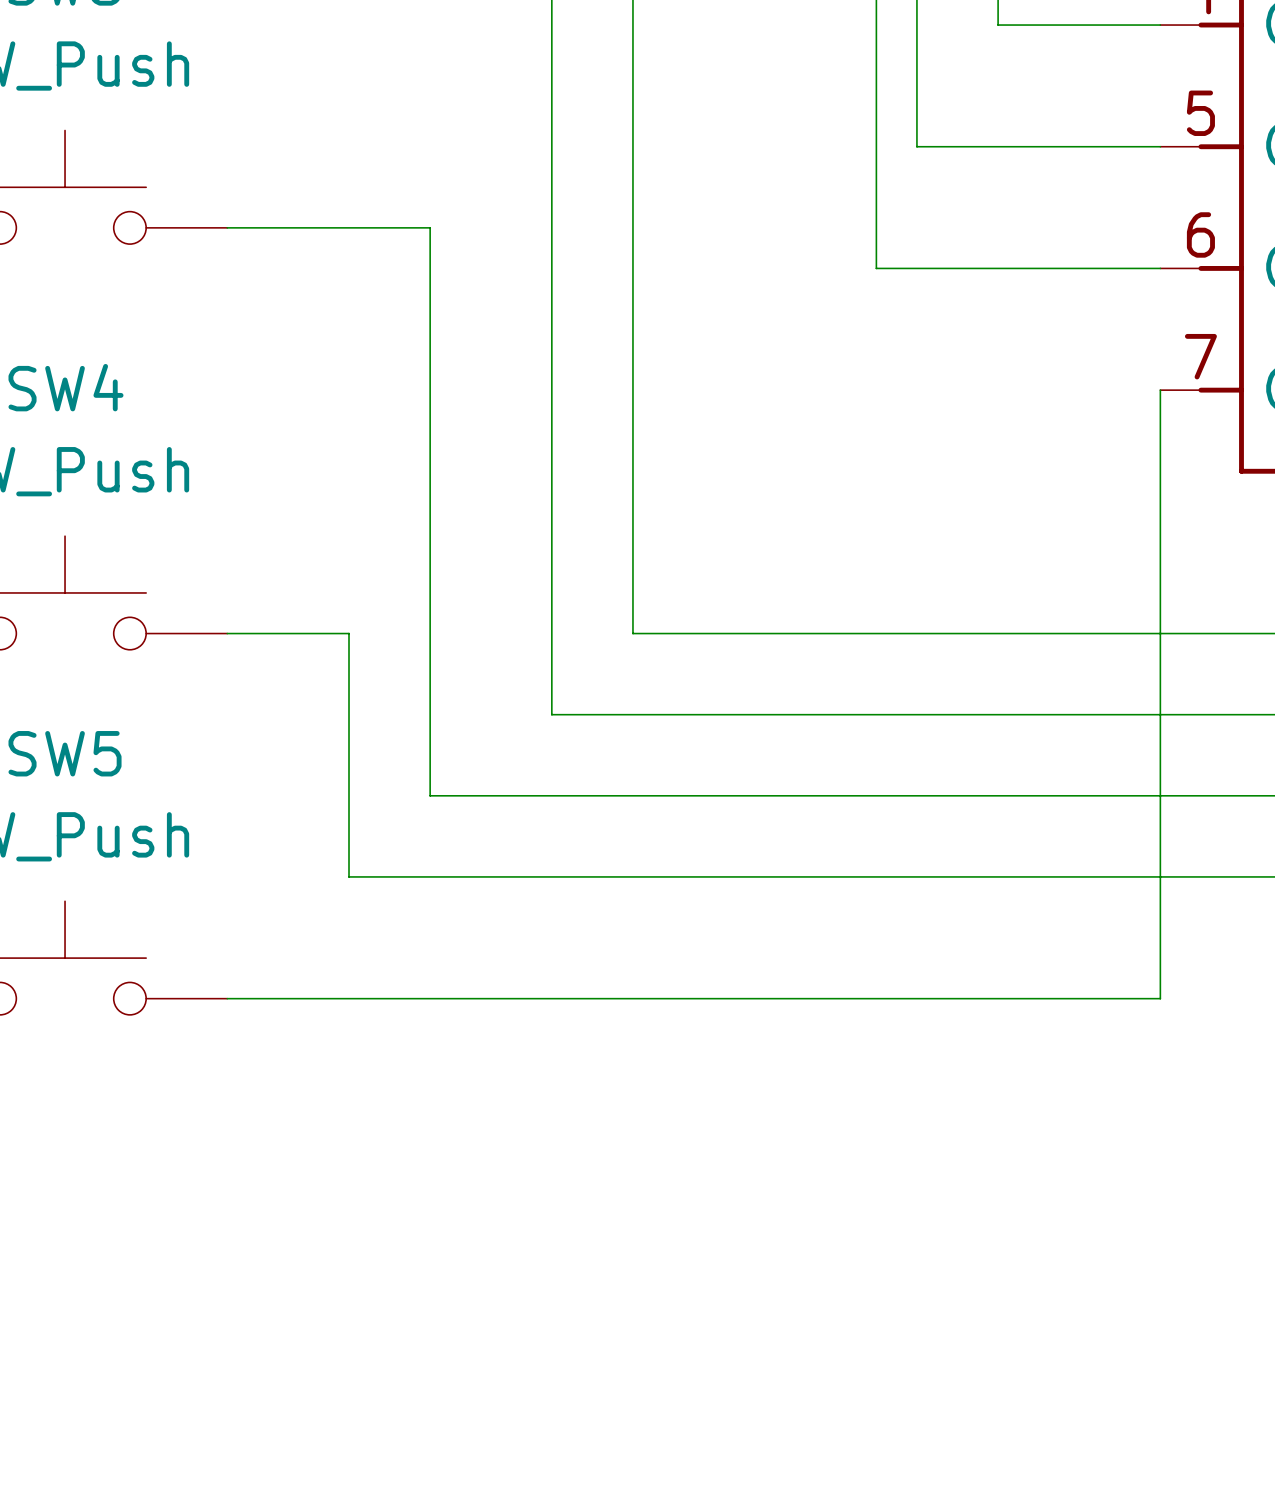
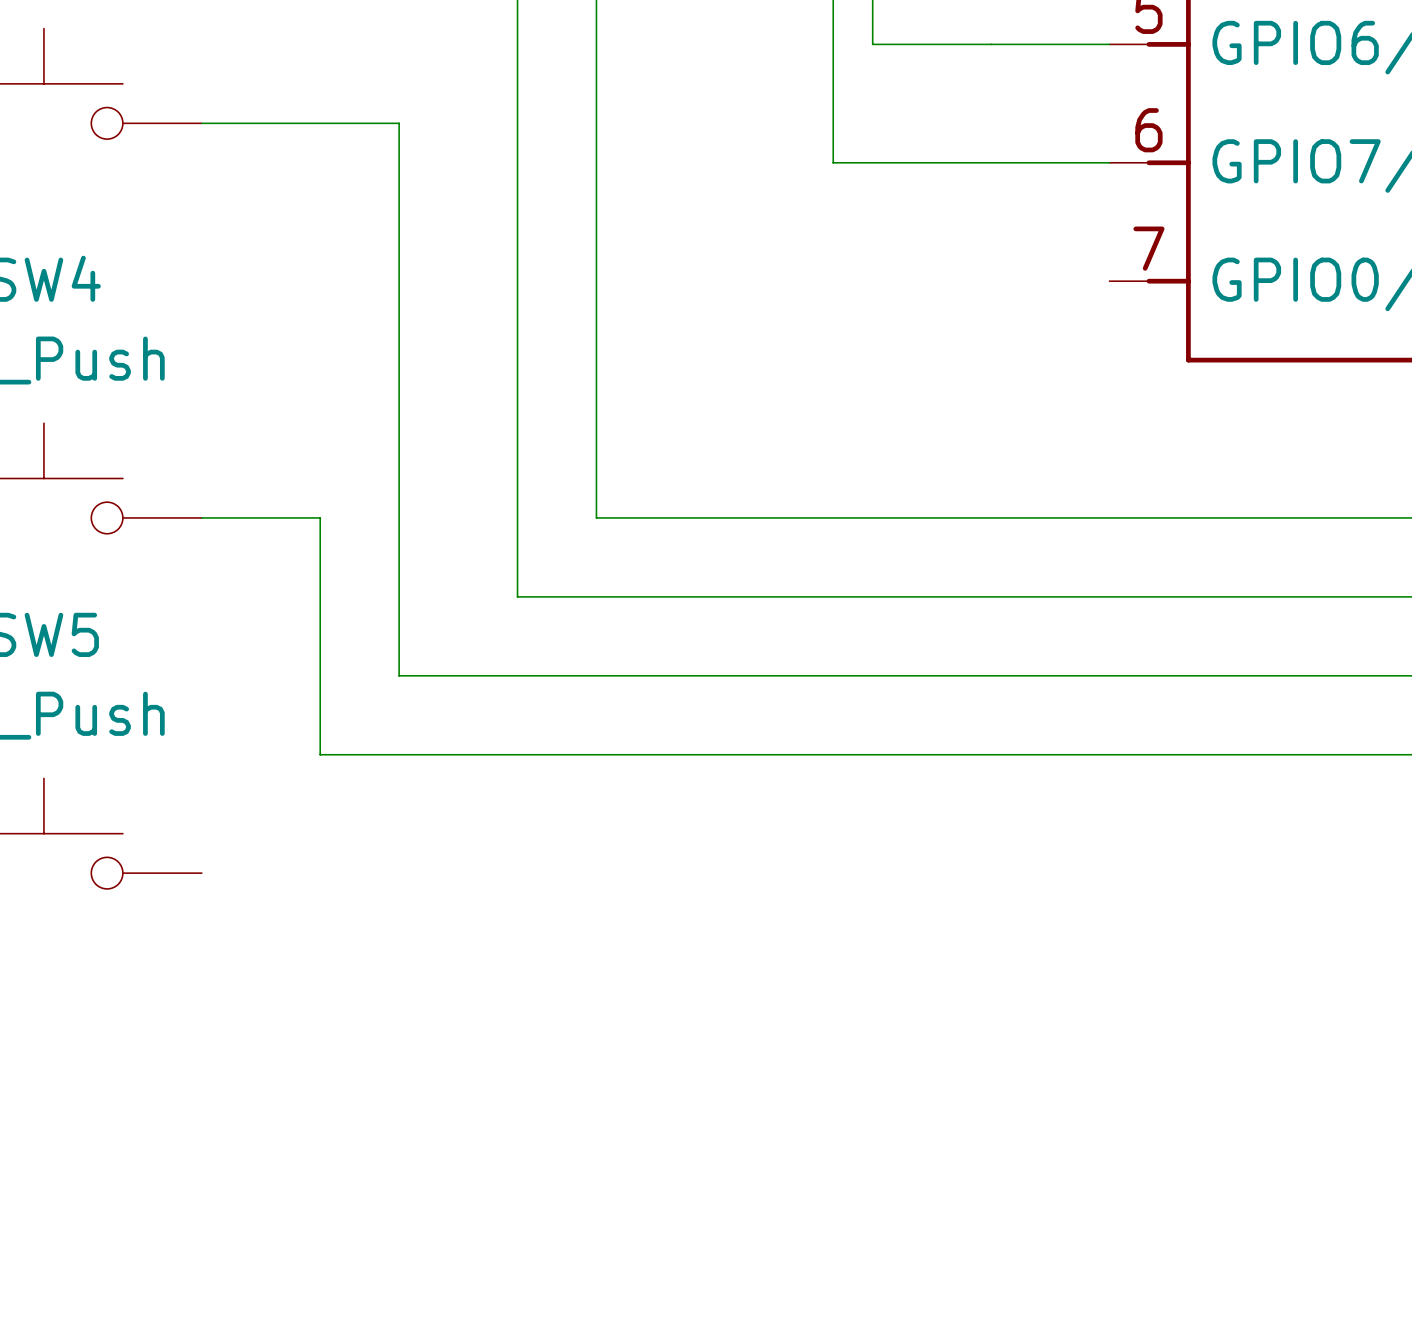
wire: (1160, 390) (1160, 998) (227, 998) -> none

